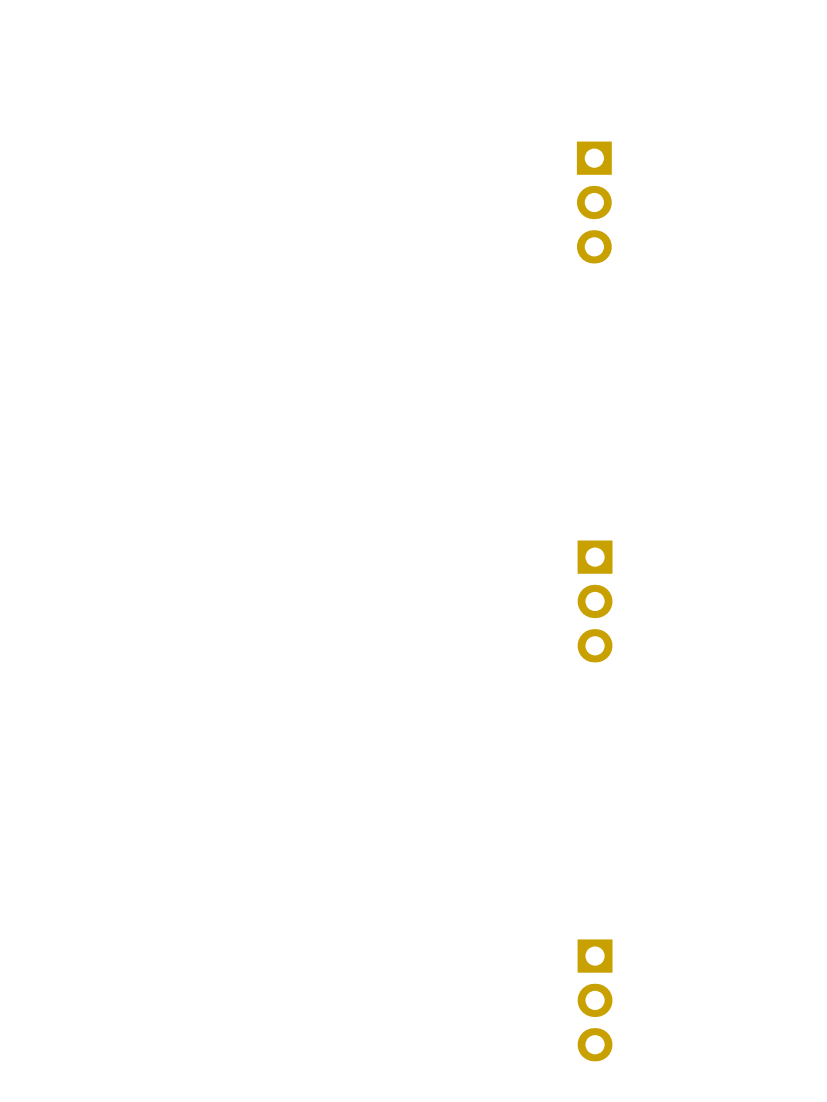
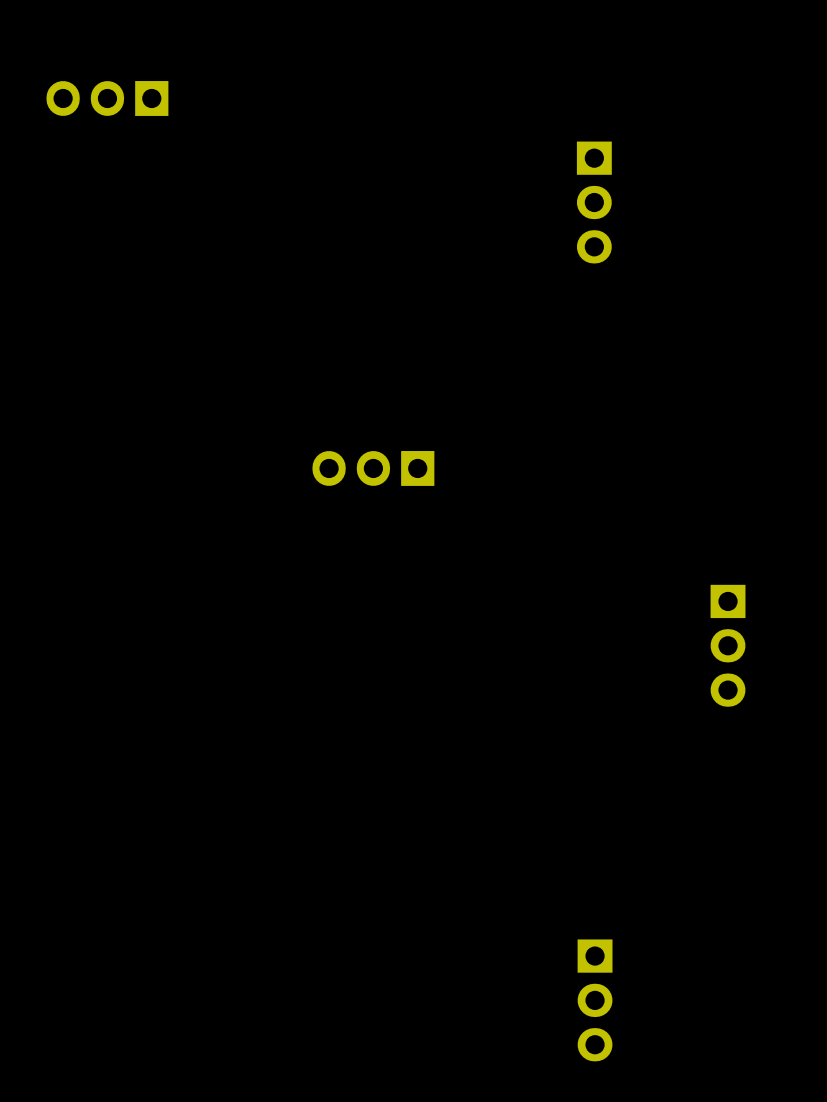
part: none -> (107, 98)
part: none -> (373, 468)
part: (595, 601) -> none
part: none -> (728, 645)

